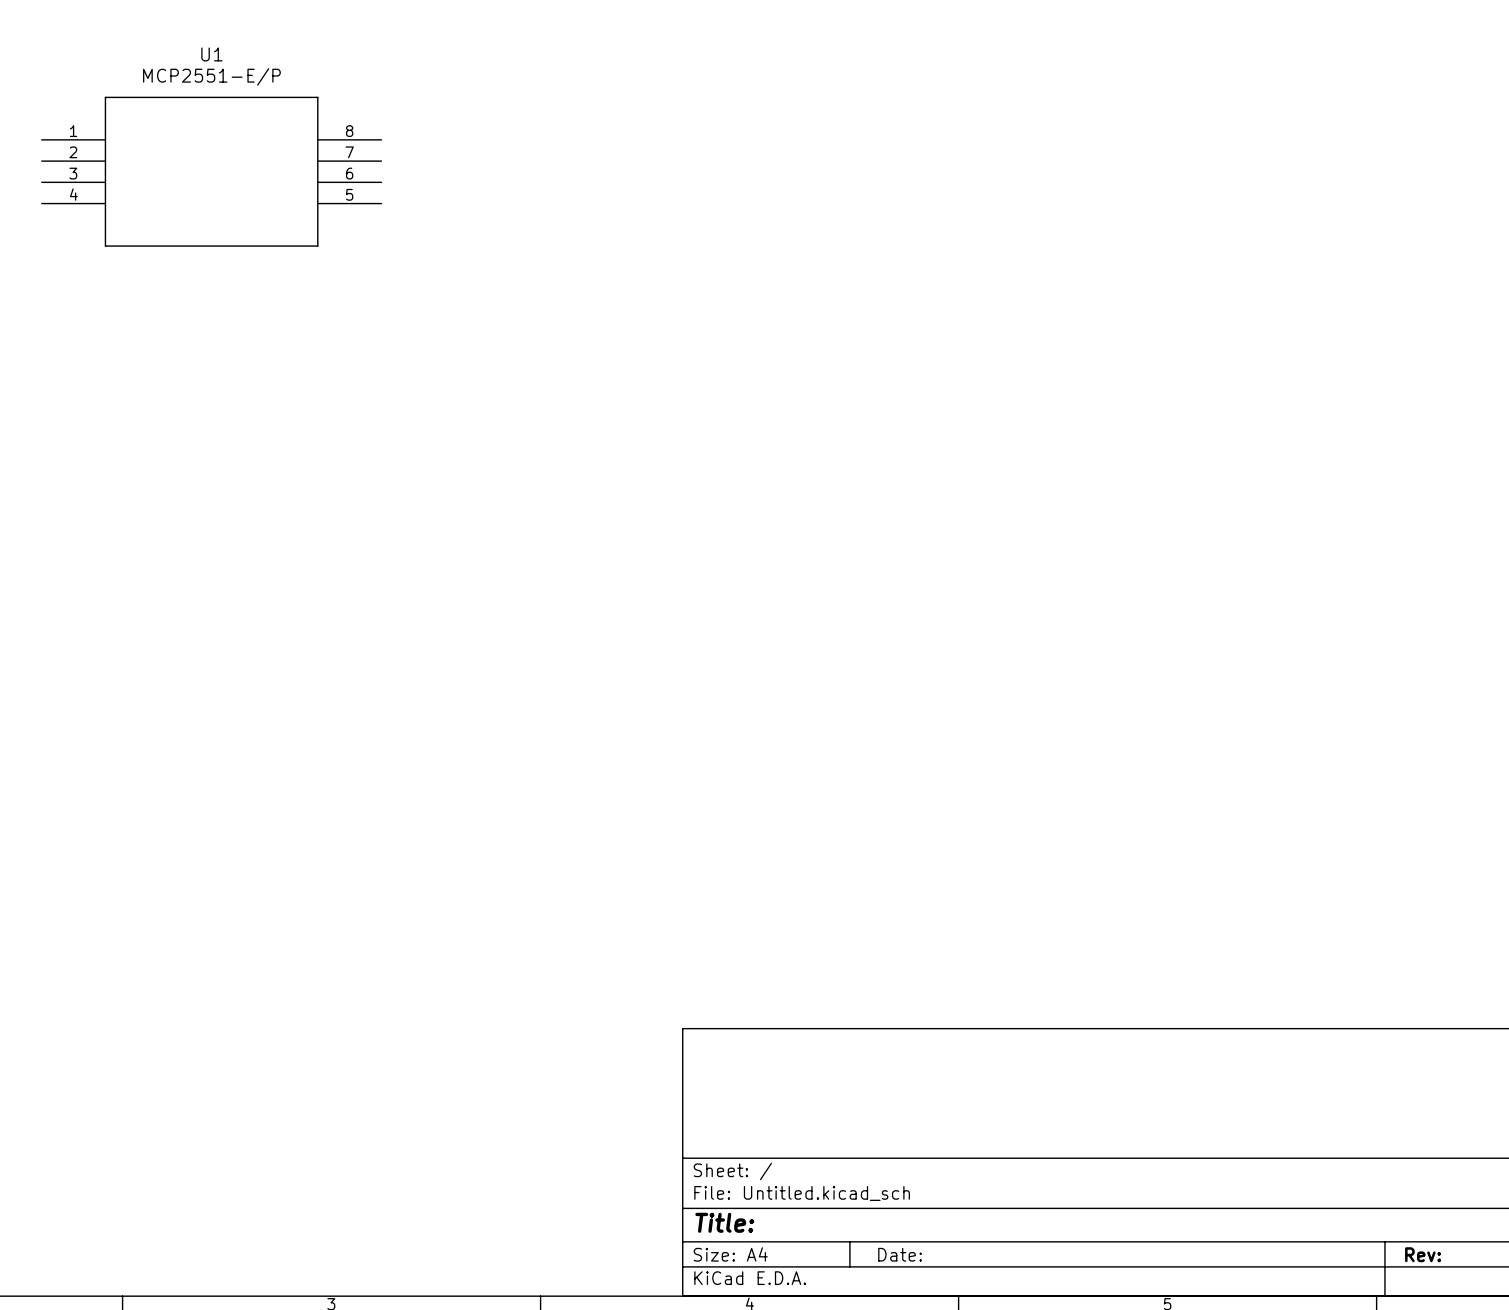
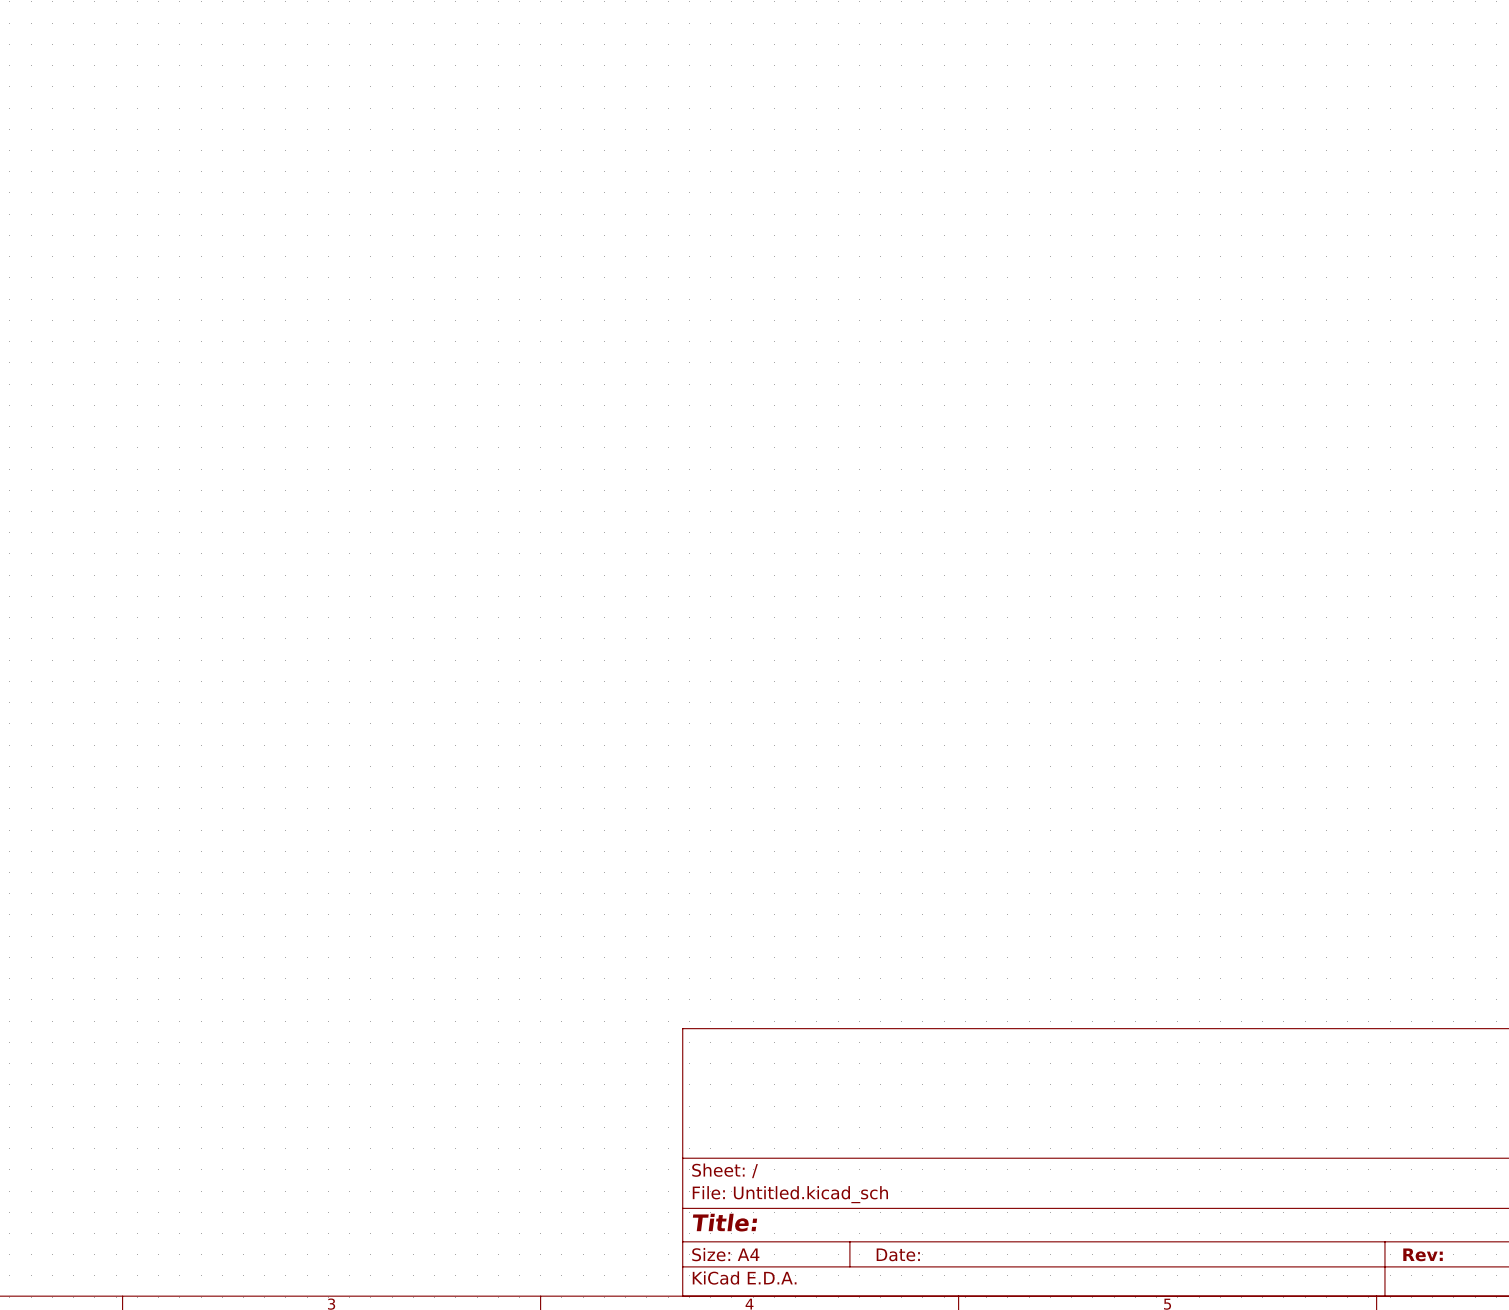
U1: MCP2551-E/P (211, 171) -> none

